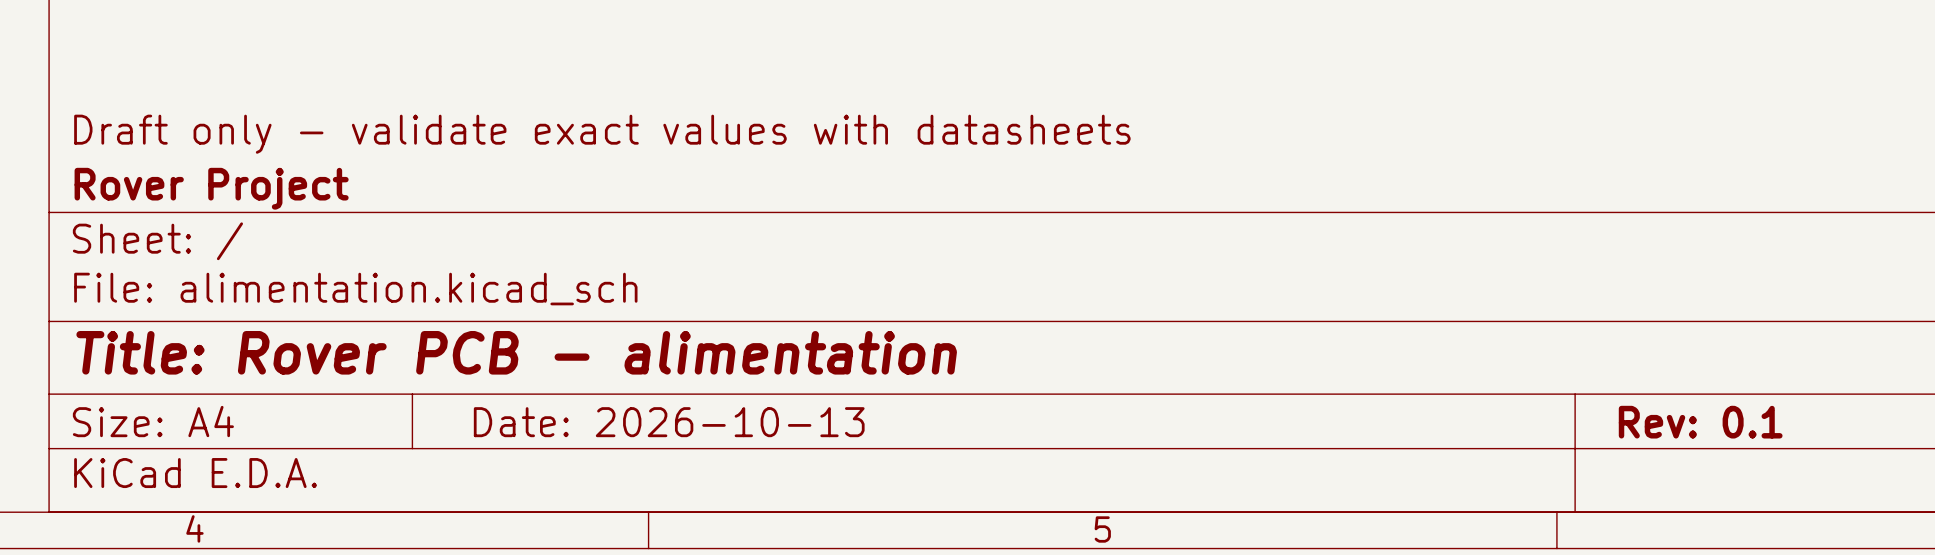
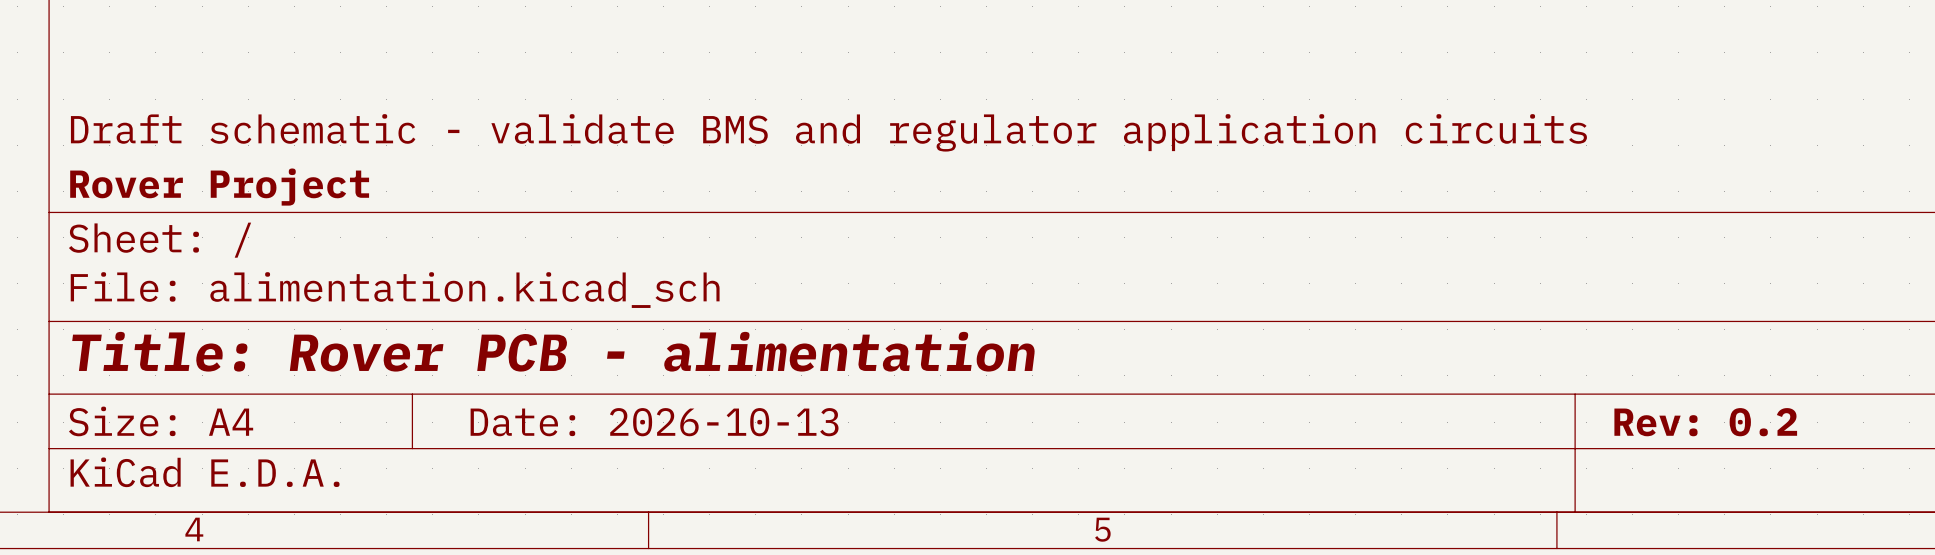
title block: Draft only - validate exact values with datasheets (602, 134) -> Draft schematic - validate BMS and regulator application circuits (828, 132)
title block: Rev: 0.1 (1700, 422) -> Rev: 0.2 (1705, 422)

